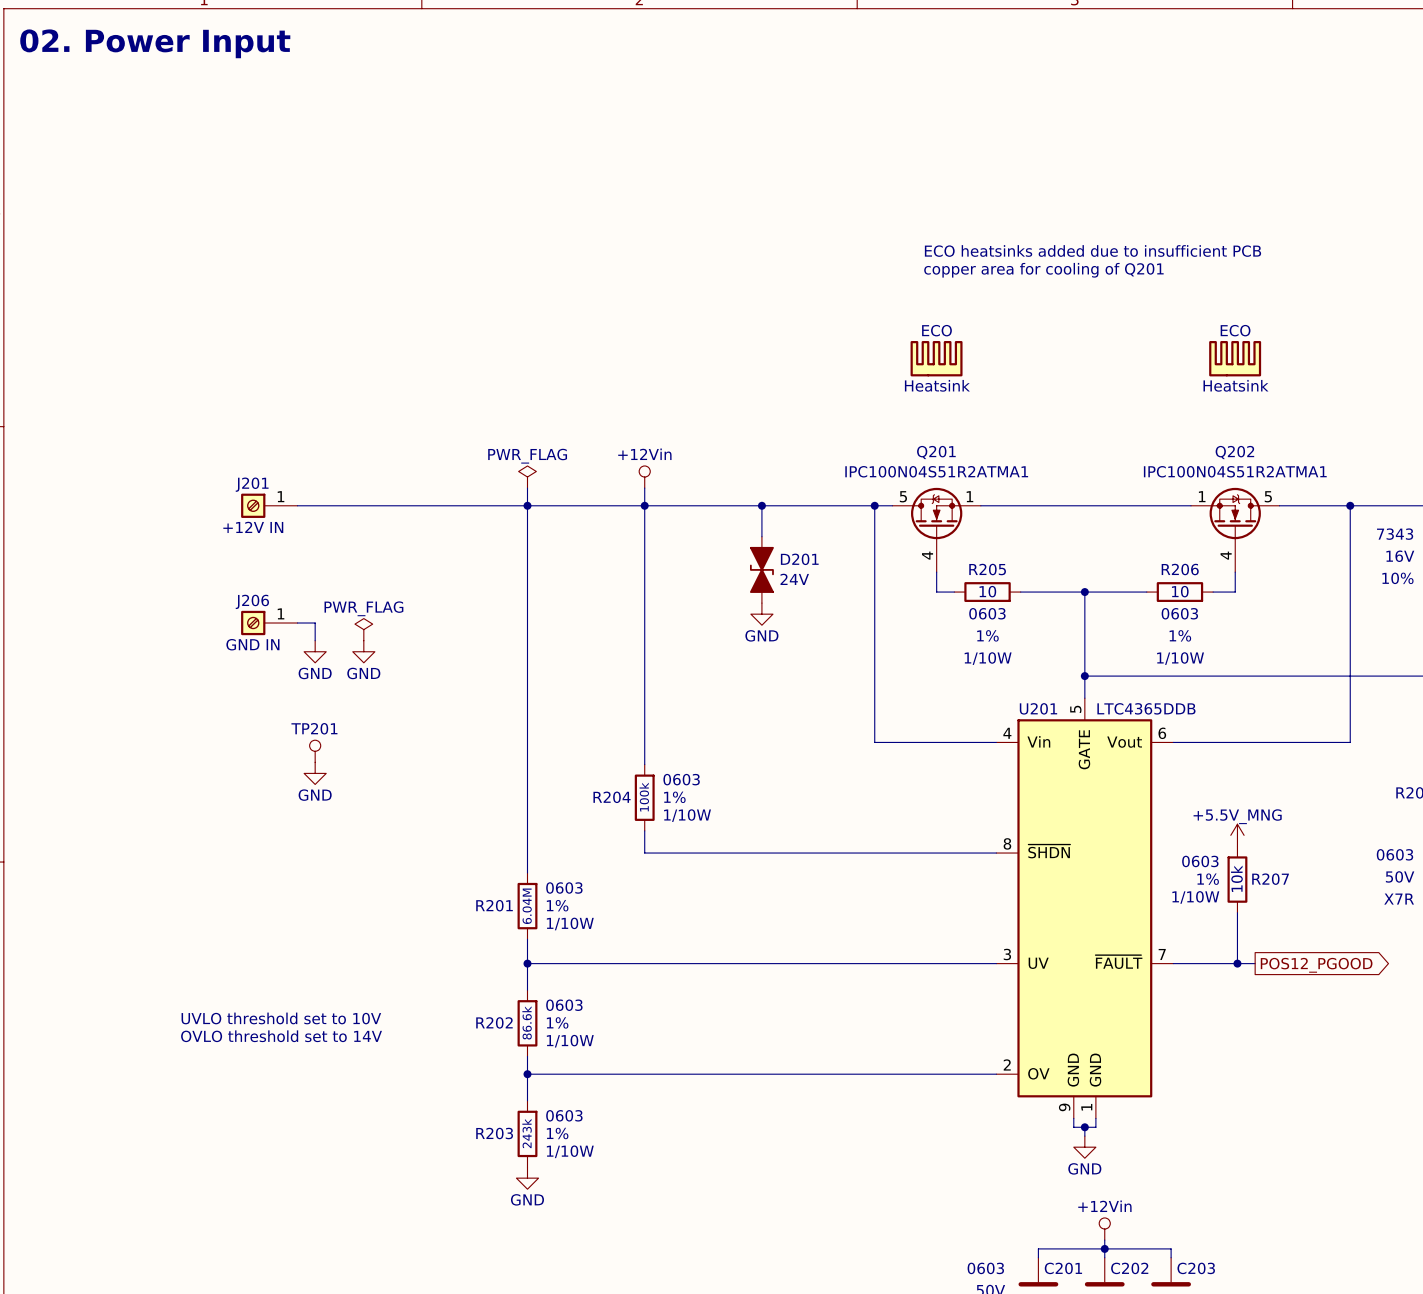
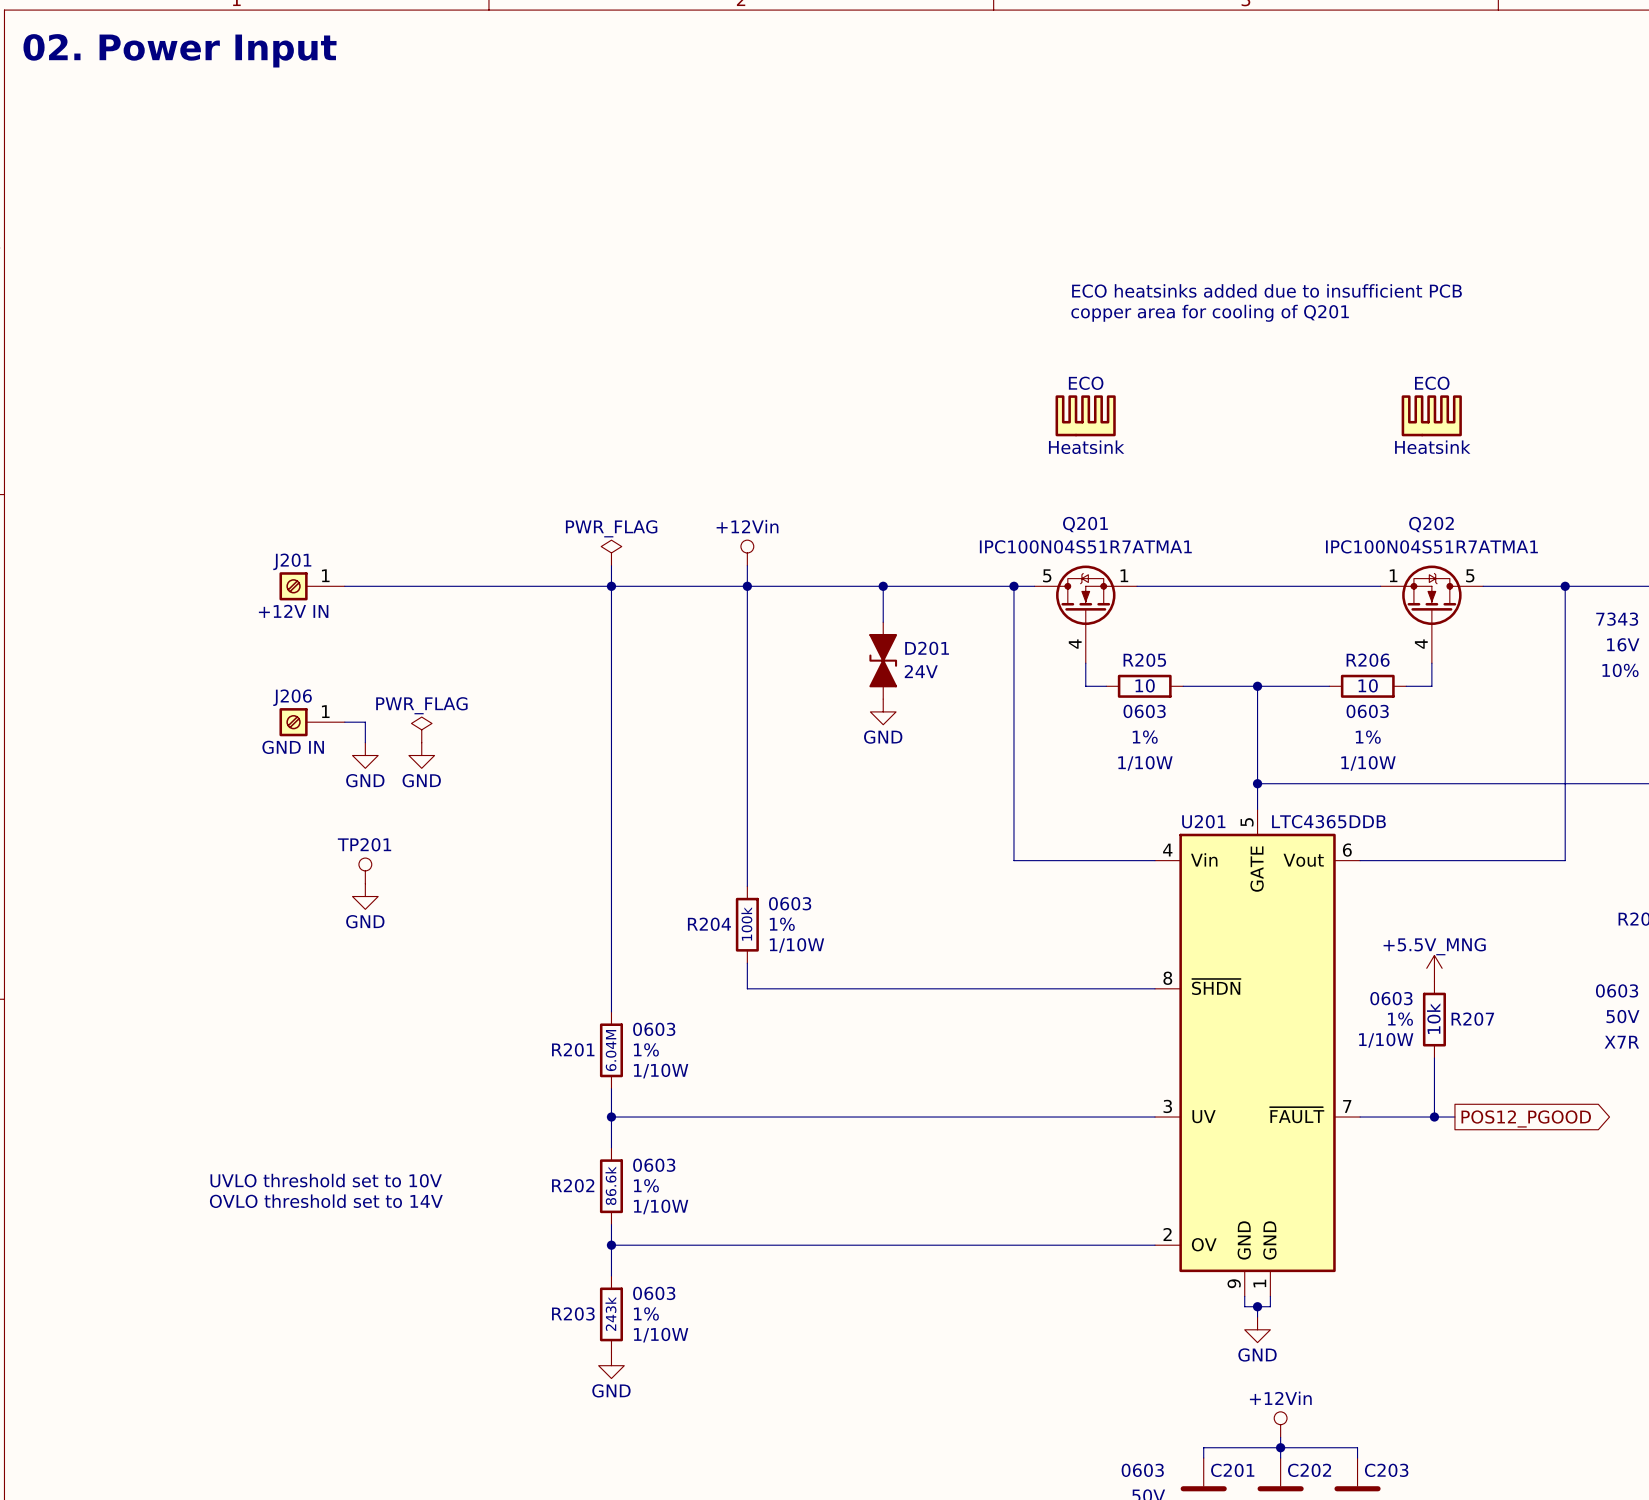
Q201 value: IPC100N04S51R2ATMA1 (936, 471) -> IPC100N04S51R7ATMA1 (1085, 546)
Q202 value: IPC100N04S51R2ATMA1 (1235, 471) -> IPC100N04S51R7ATMA1 (1431, 546)

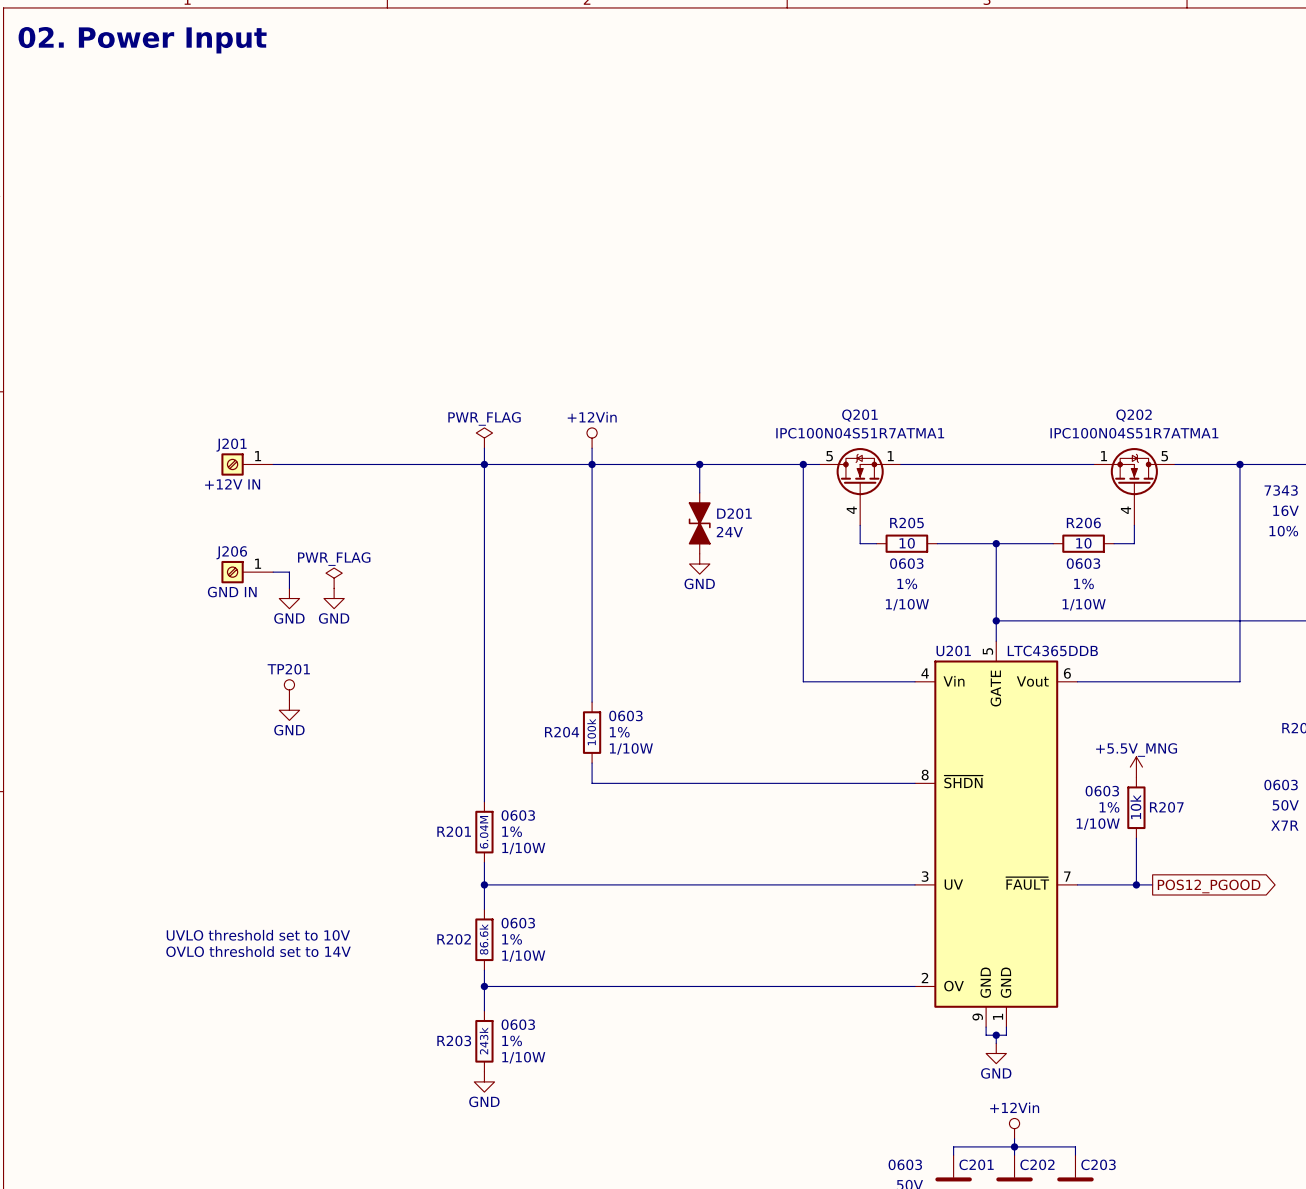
text: ECO heatsinks added due to insufficient PCB (1266, 290) -> none
text: copper area for cooling of Q201 (1210, 313) -> none
ECO: Heatsink (1085, 415) -> none
ECO: Heatsink (1431, 415) -> none

